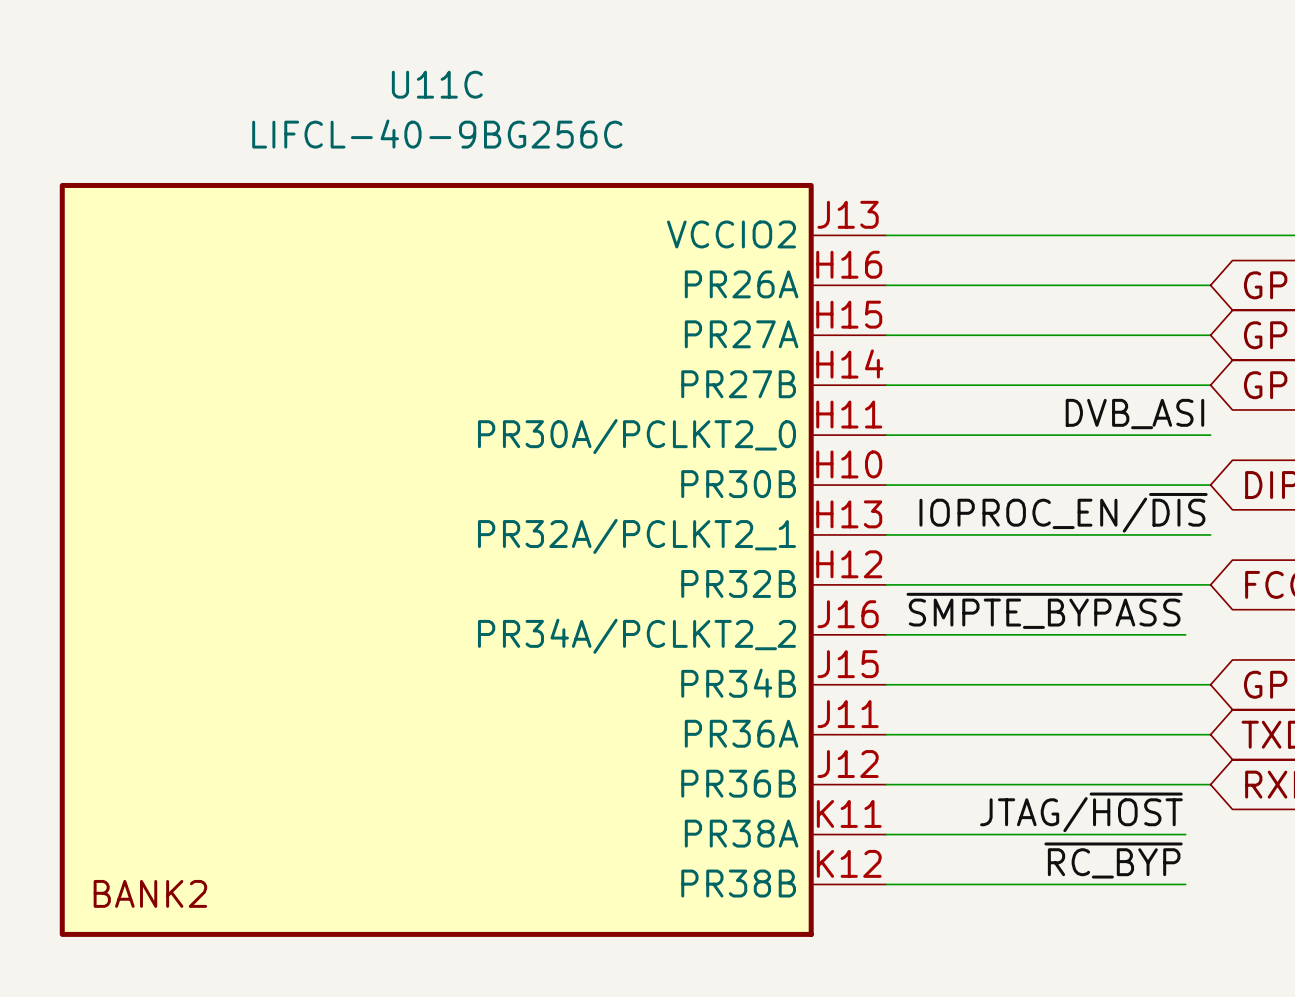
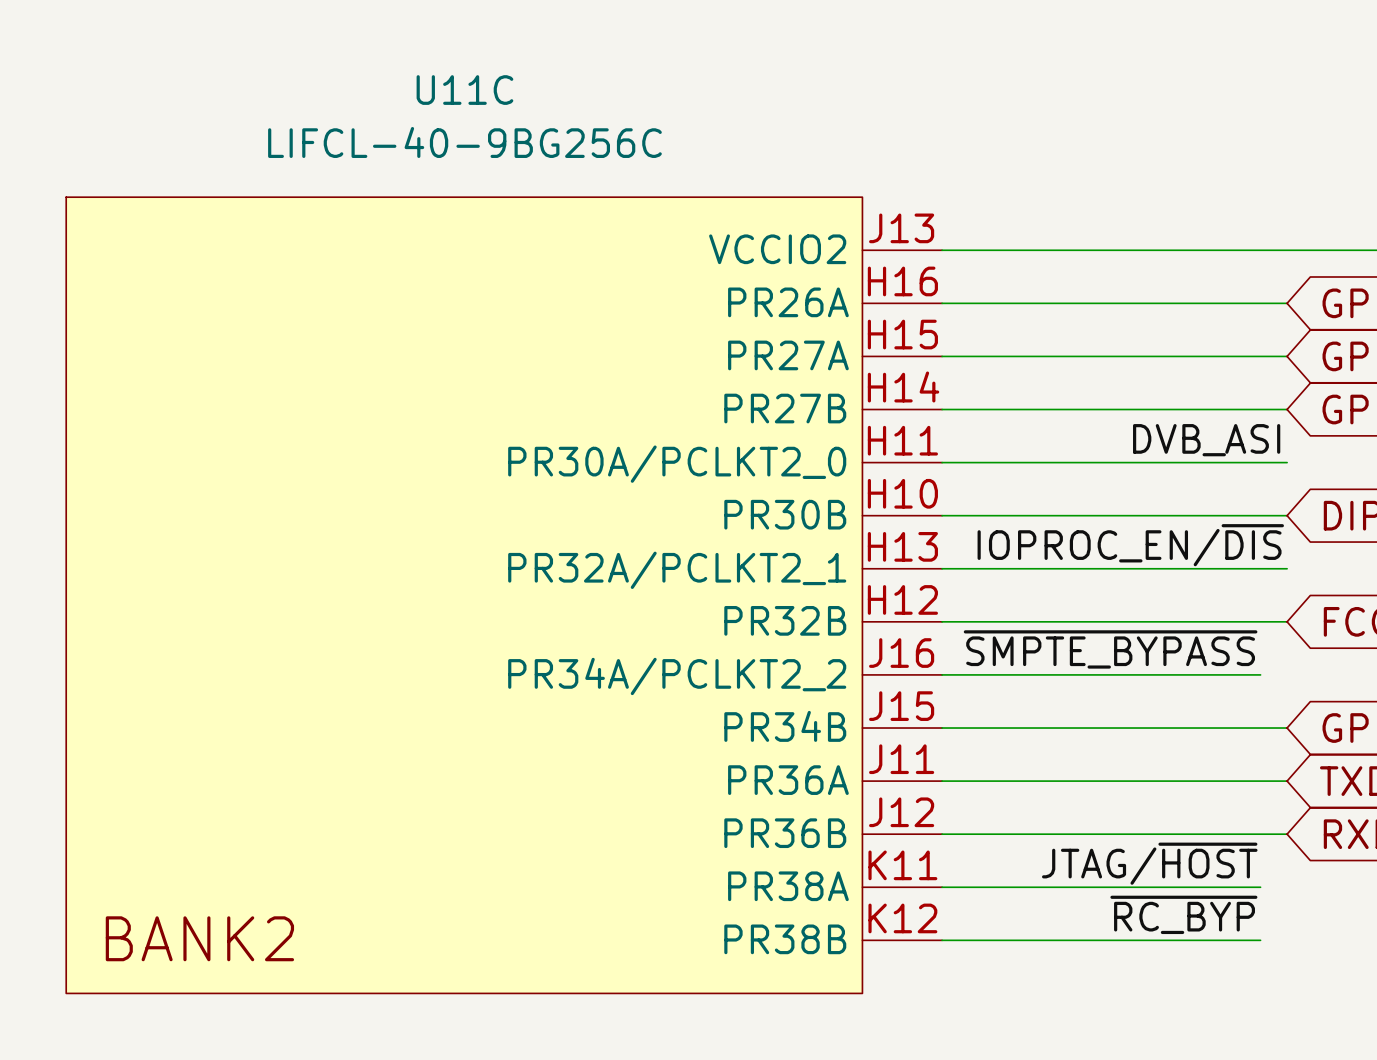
U11C symbol: [59, 182, 887, 937] -> [66, 197, 943, 994]

